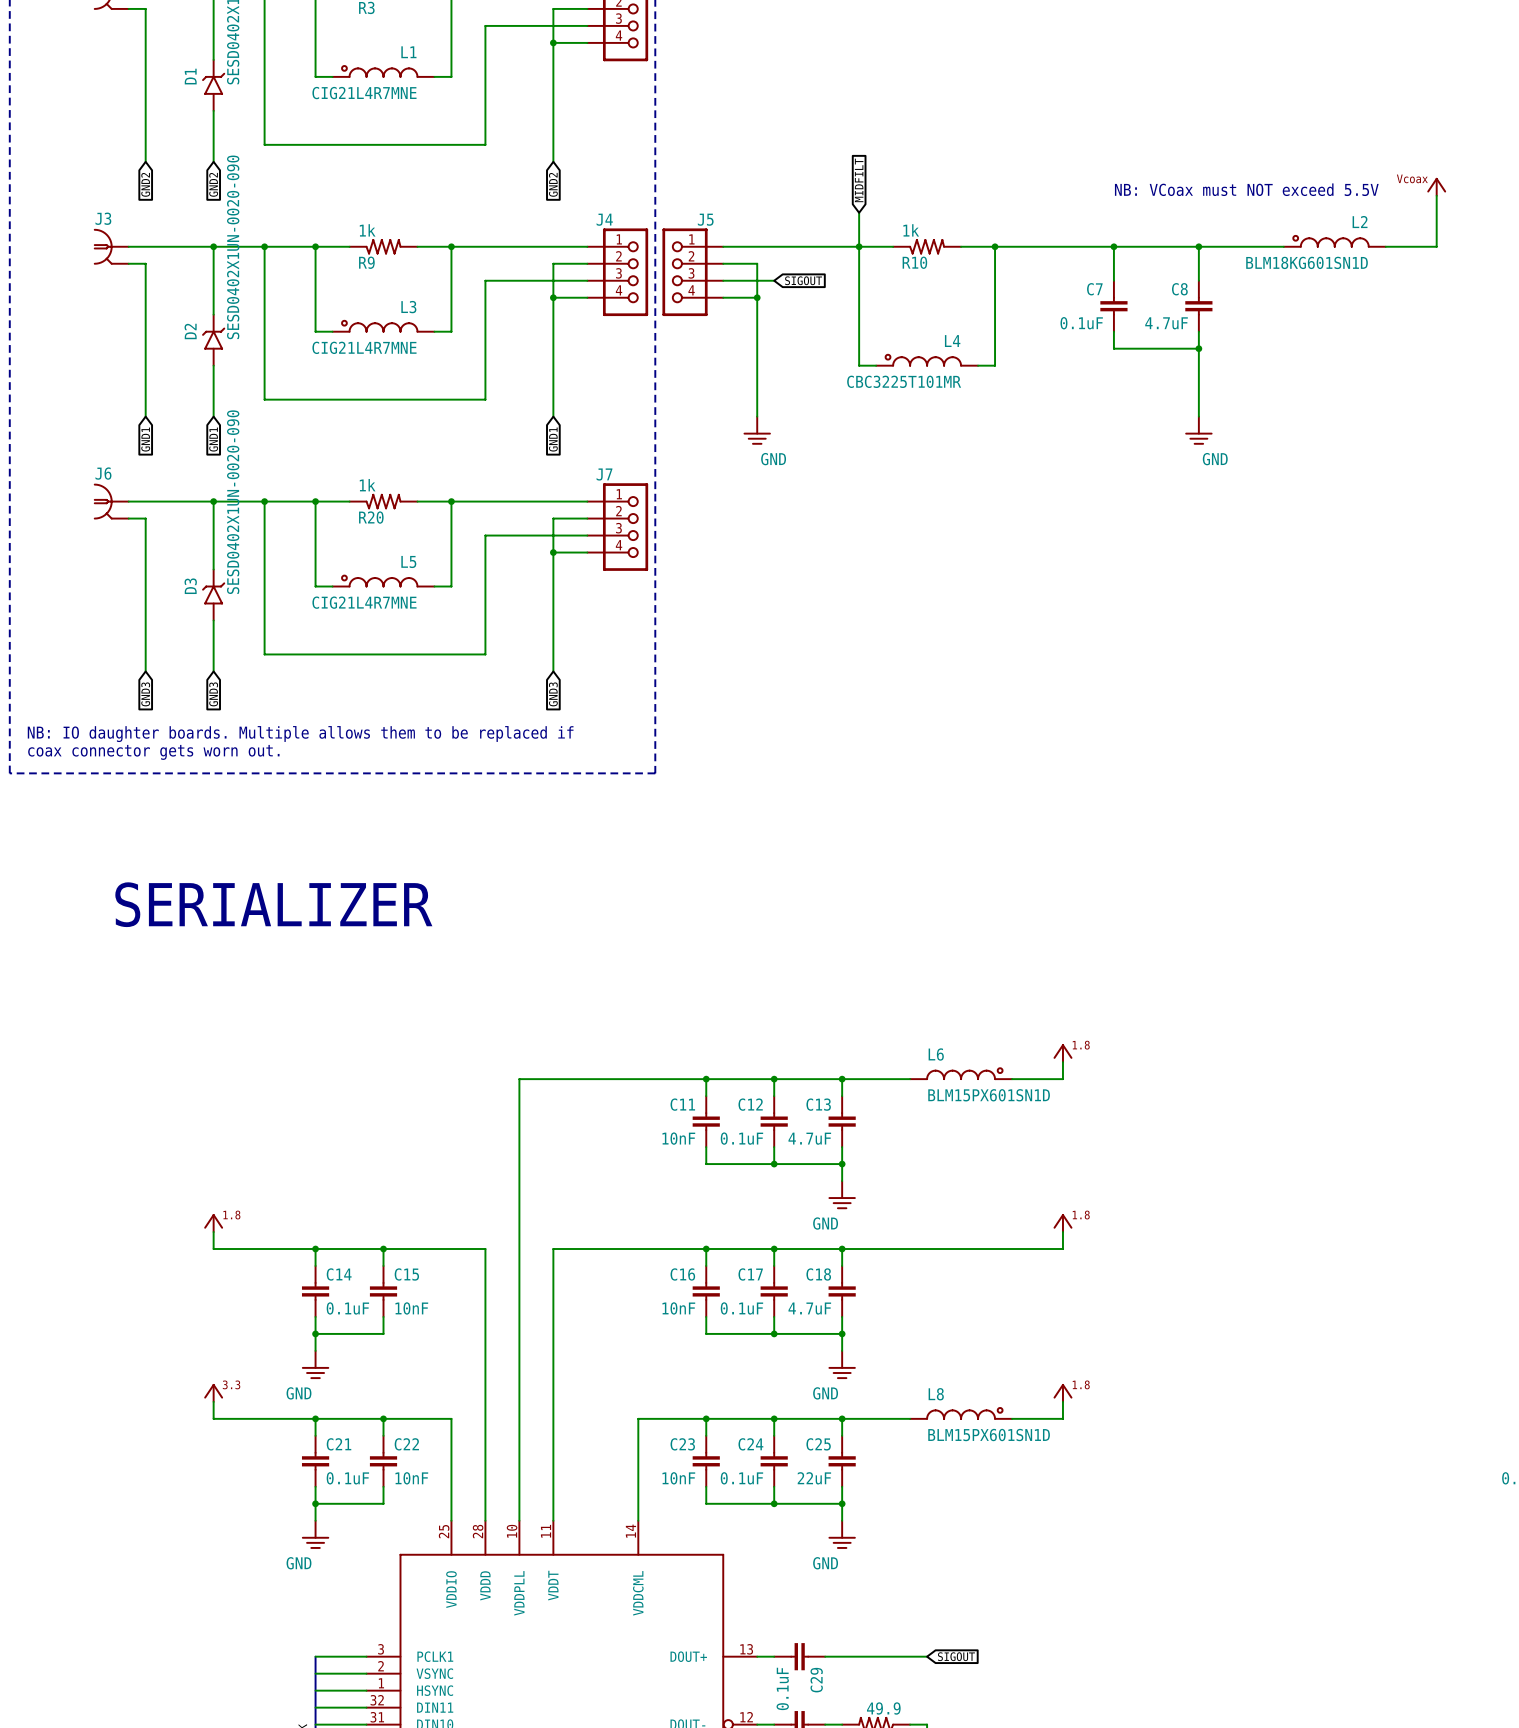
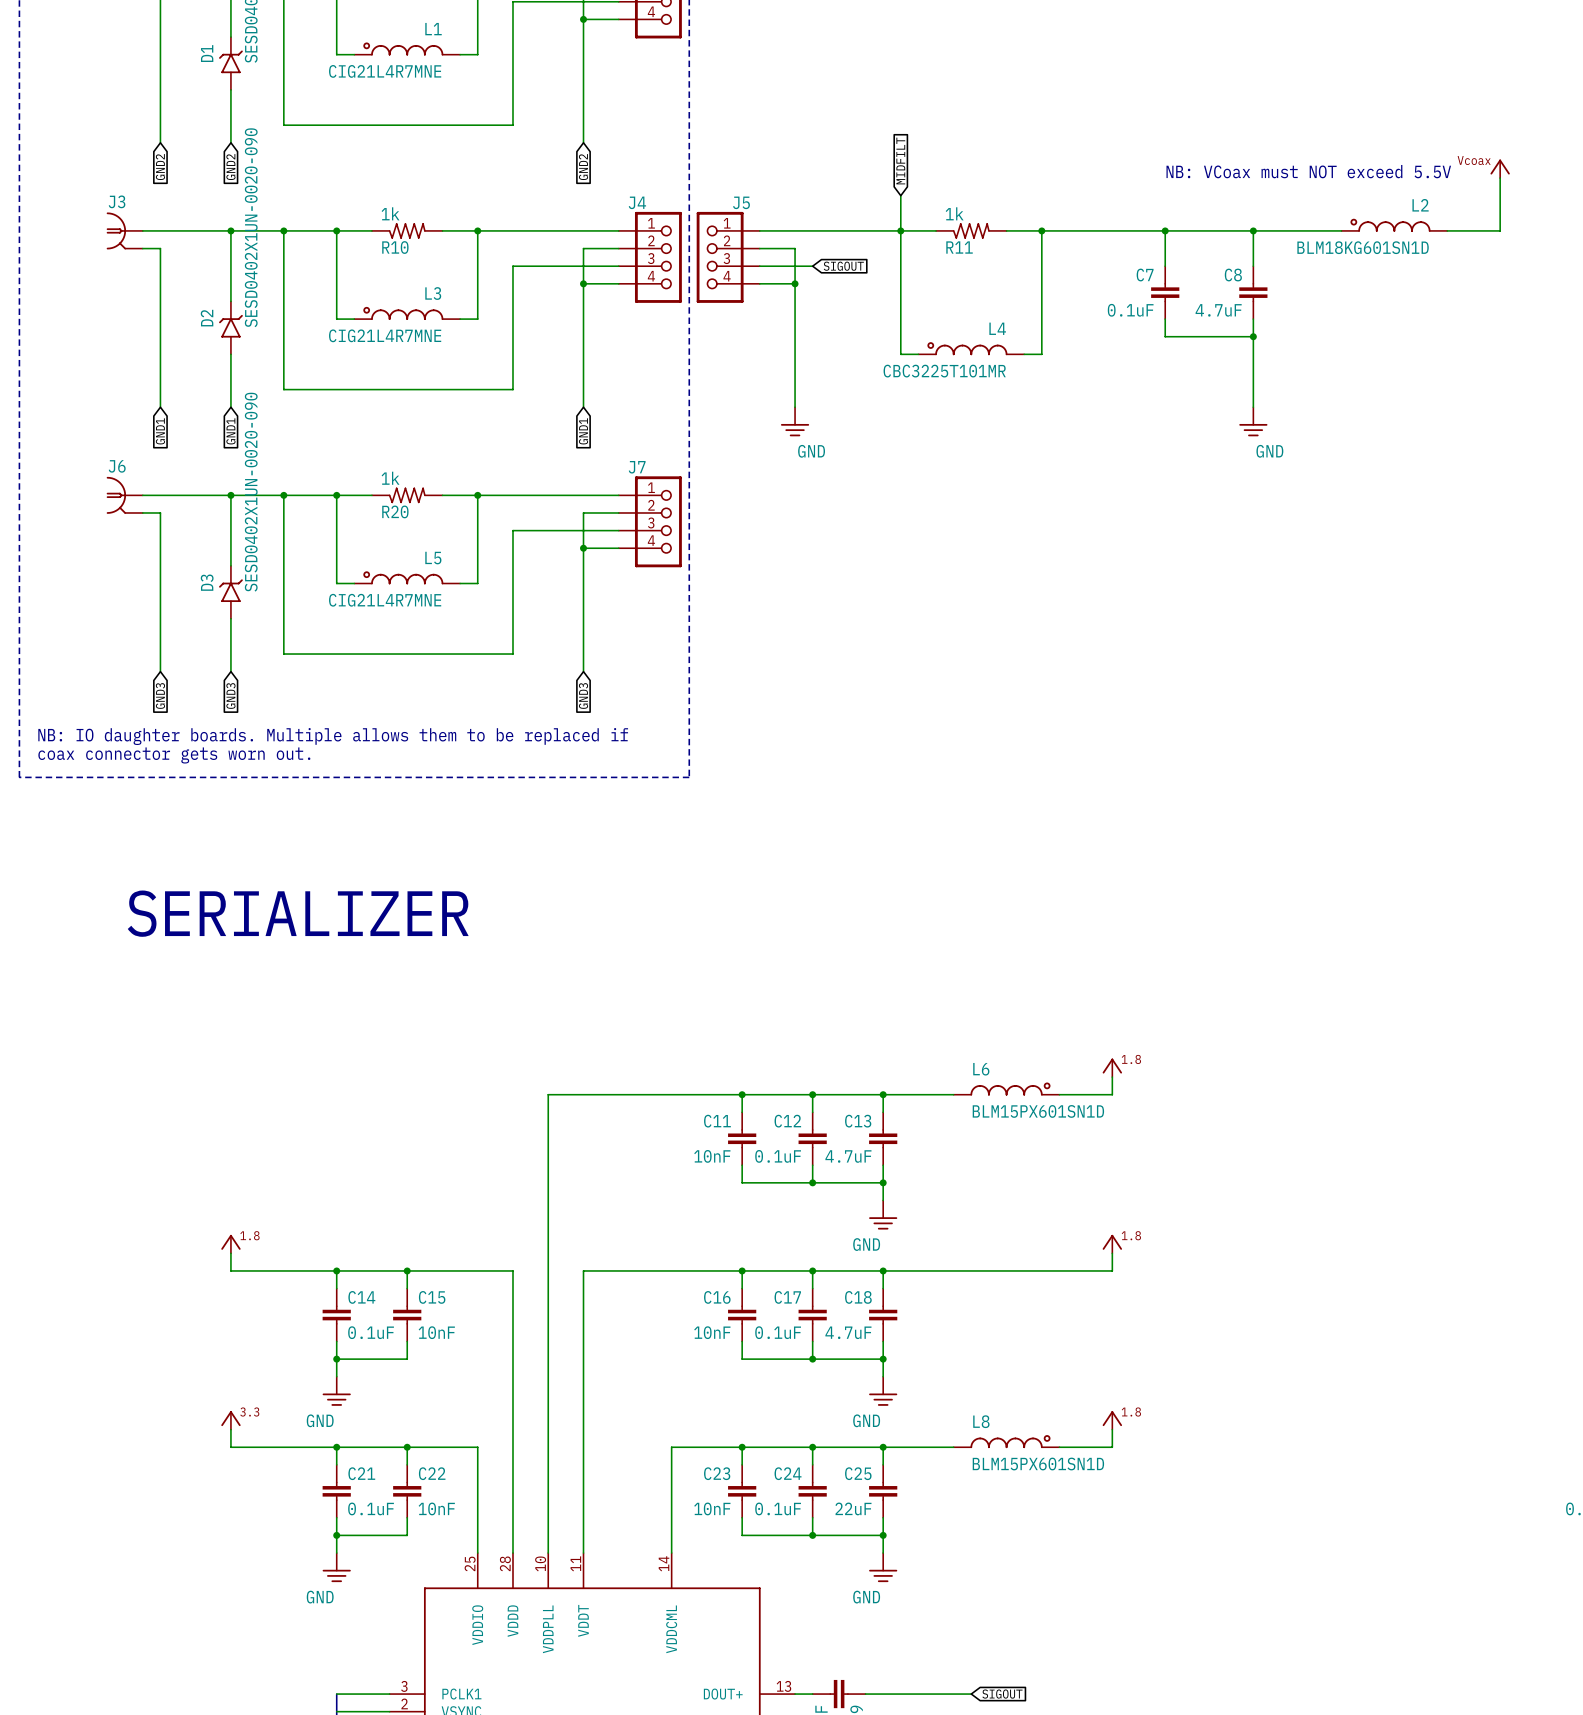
R9 name: R9 (366, 262) -> R10 (395, 247)
R10 name: R10 (914, 262) -> R11 (959, 247)

